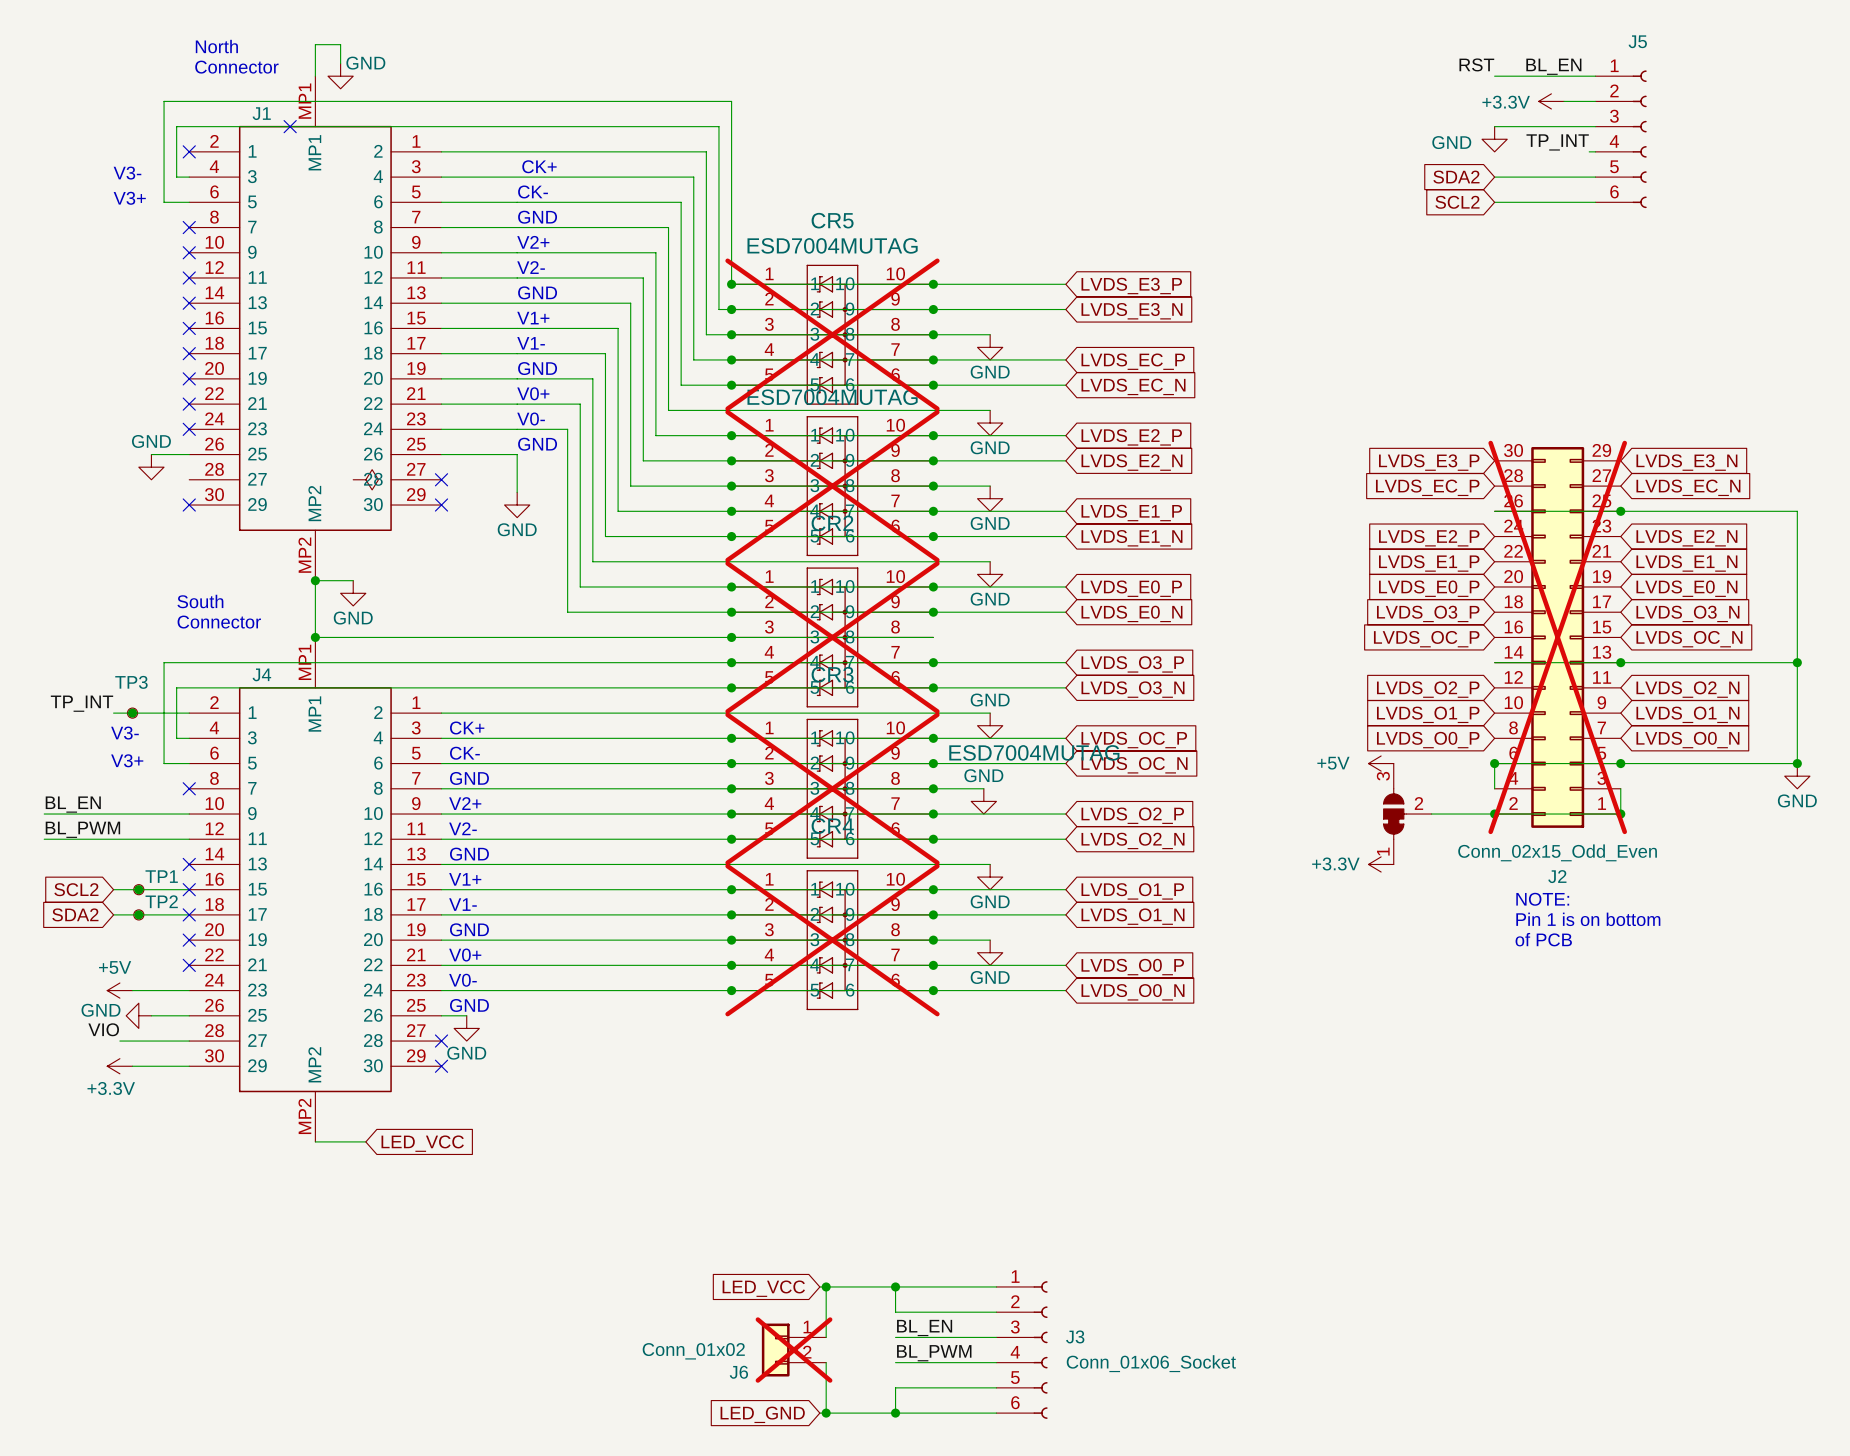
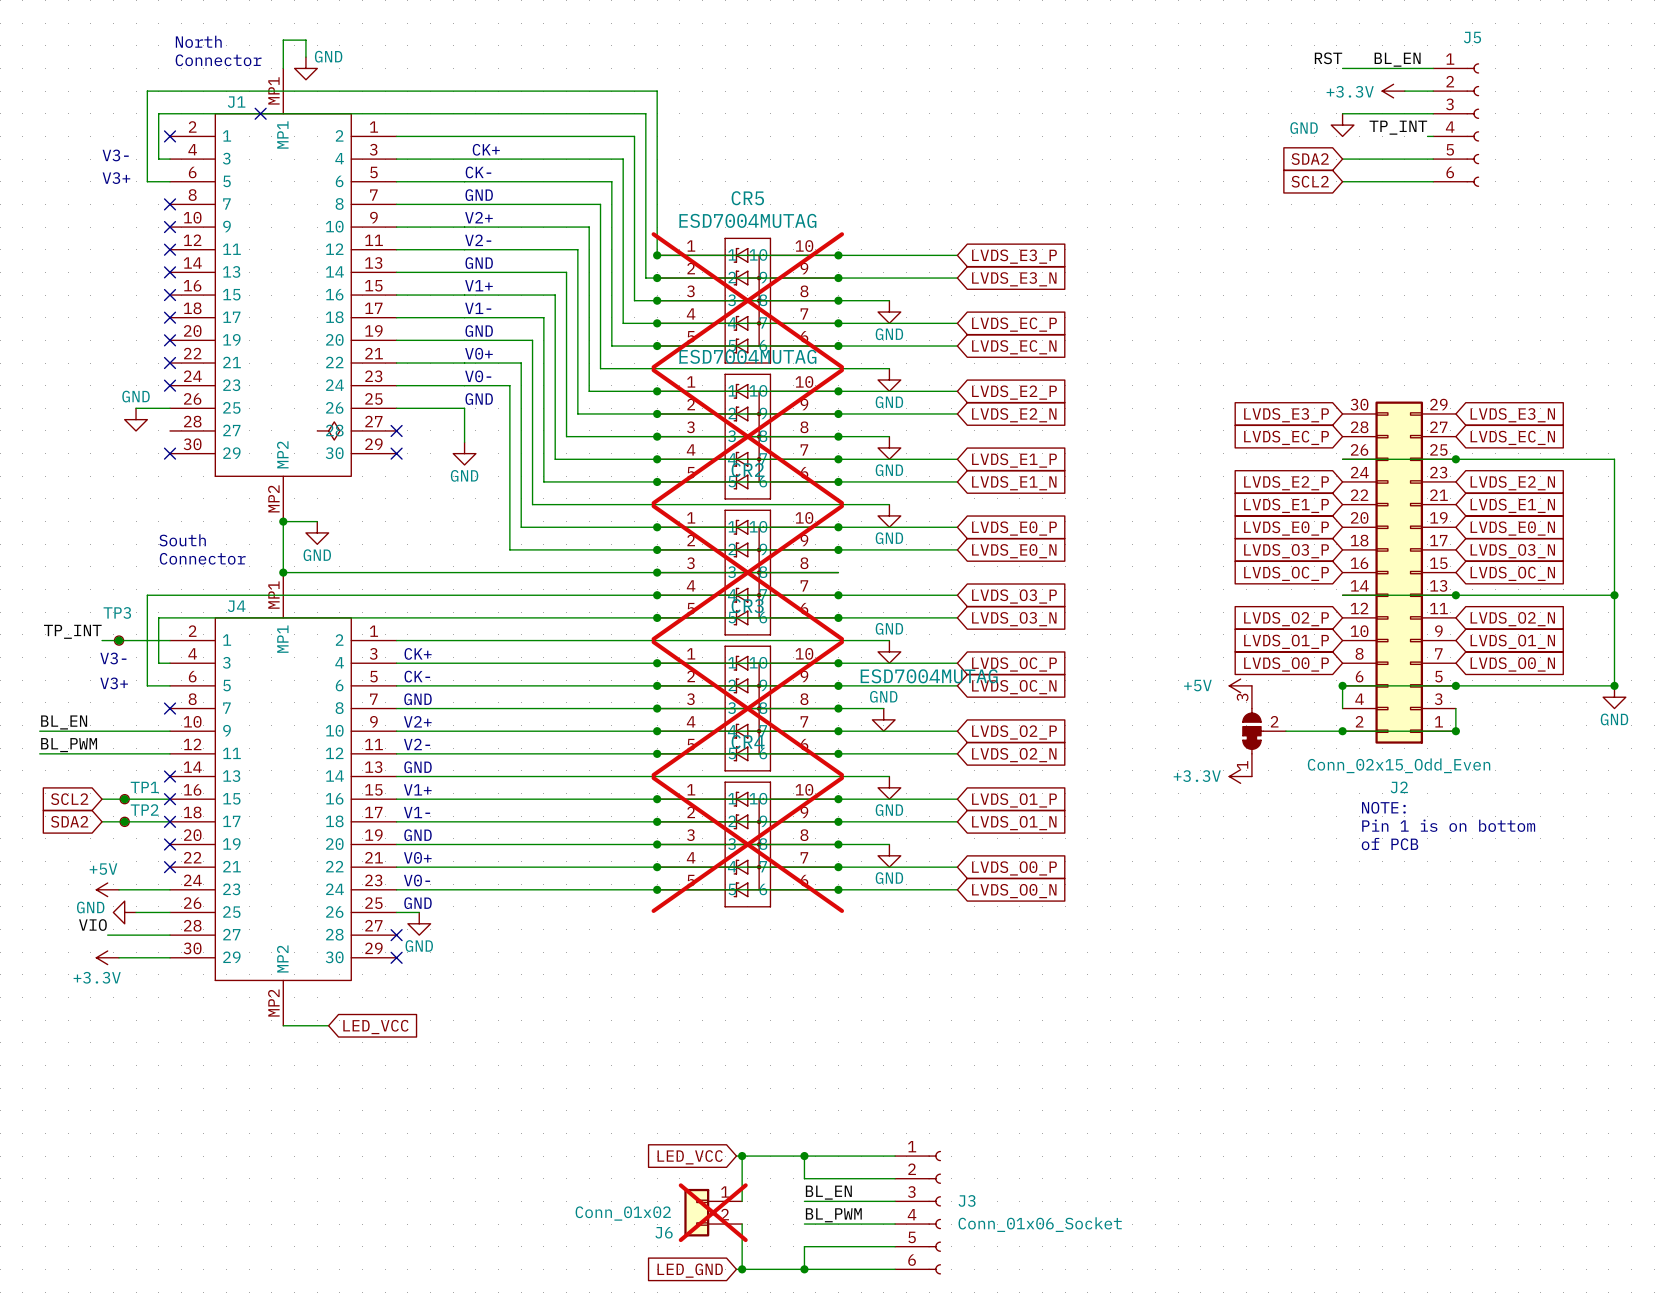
J2 do-not-place cross: (1557, 637) -> none

